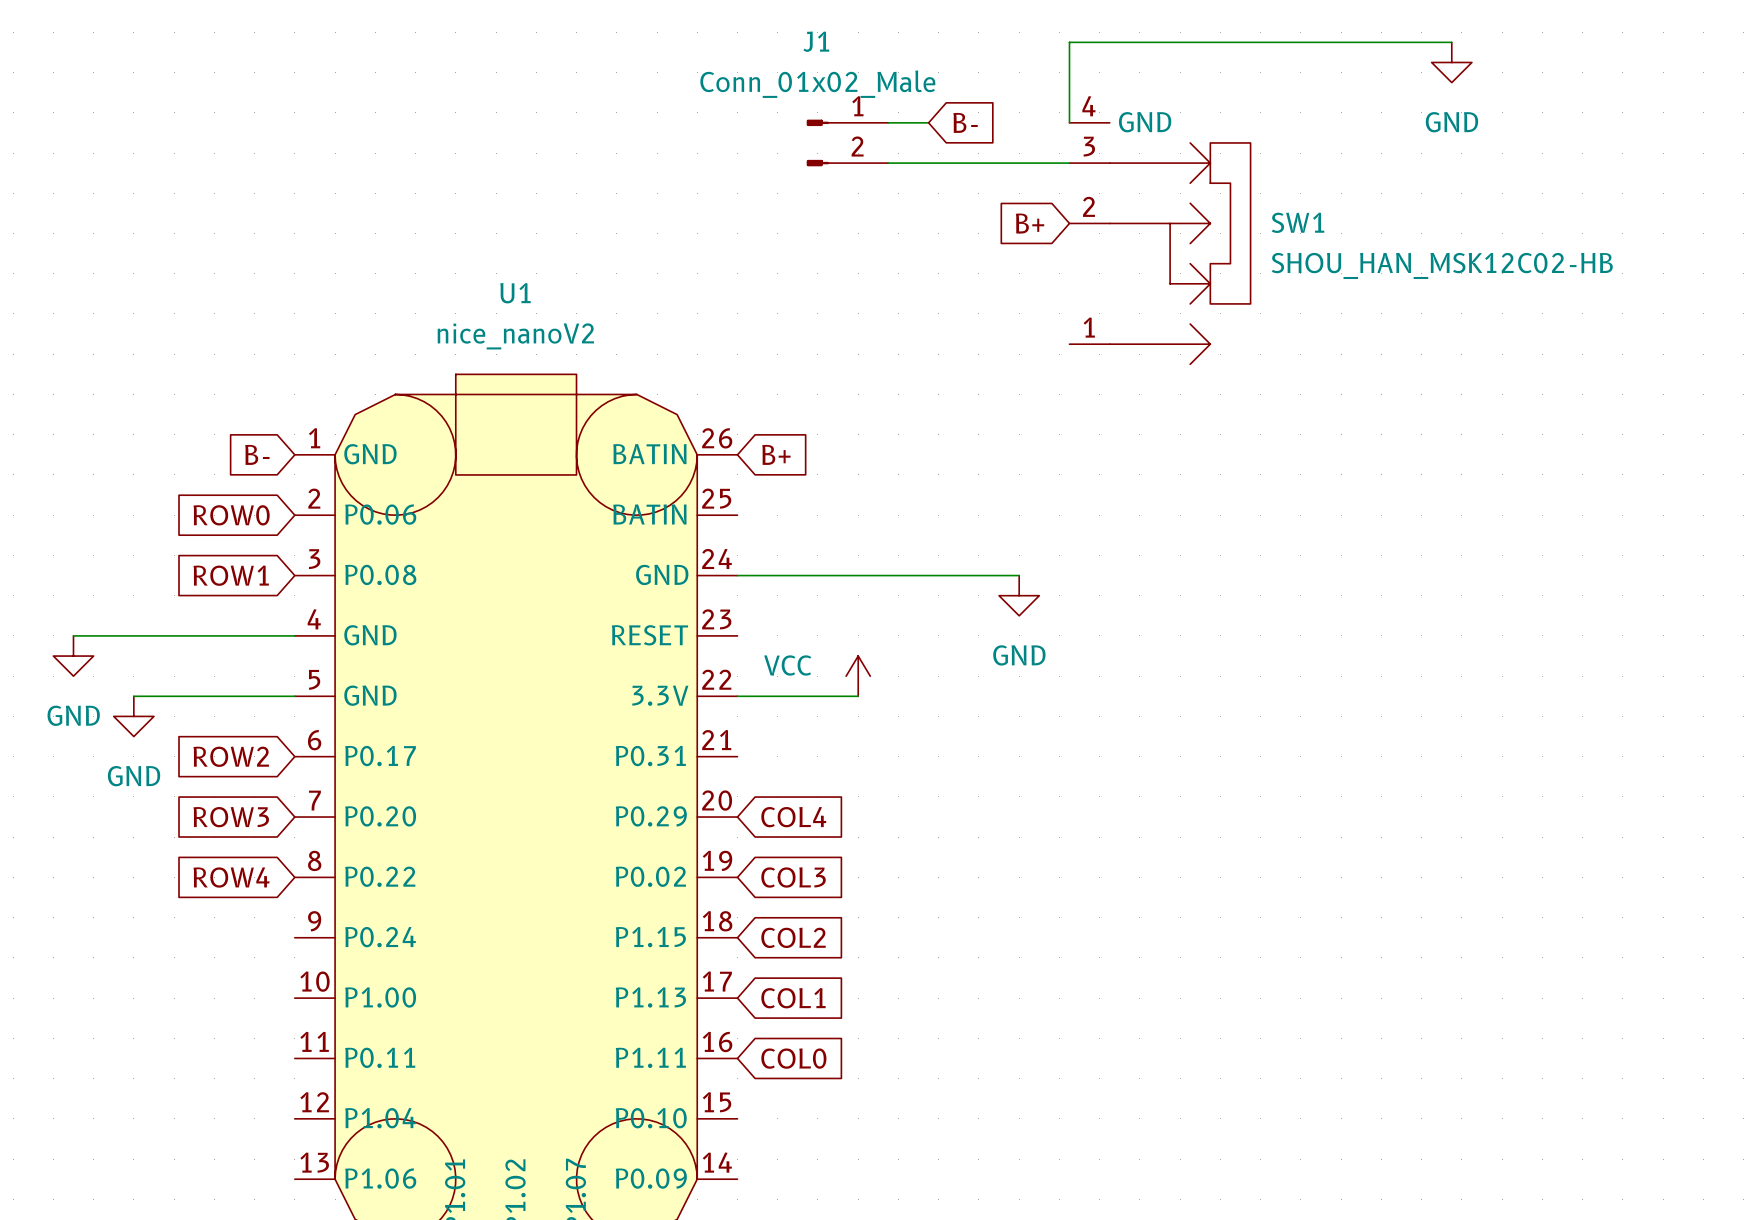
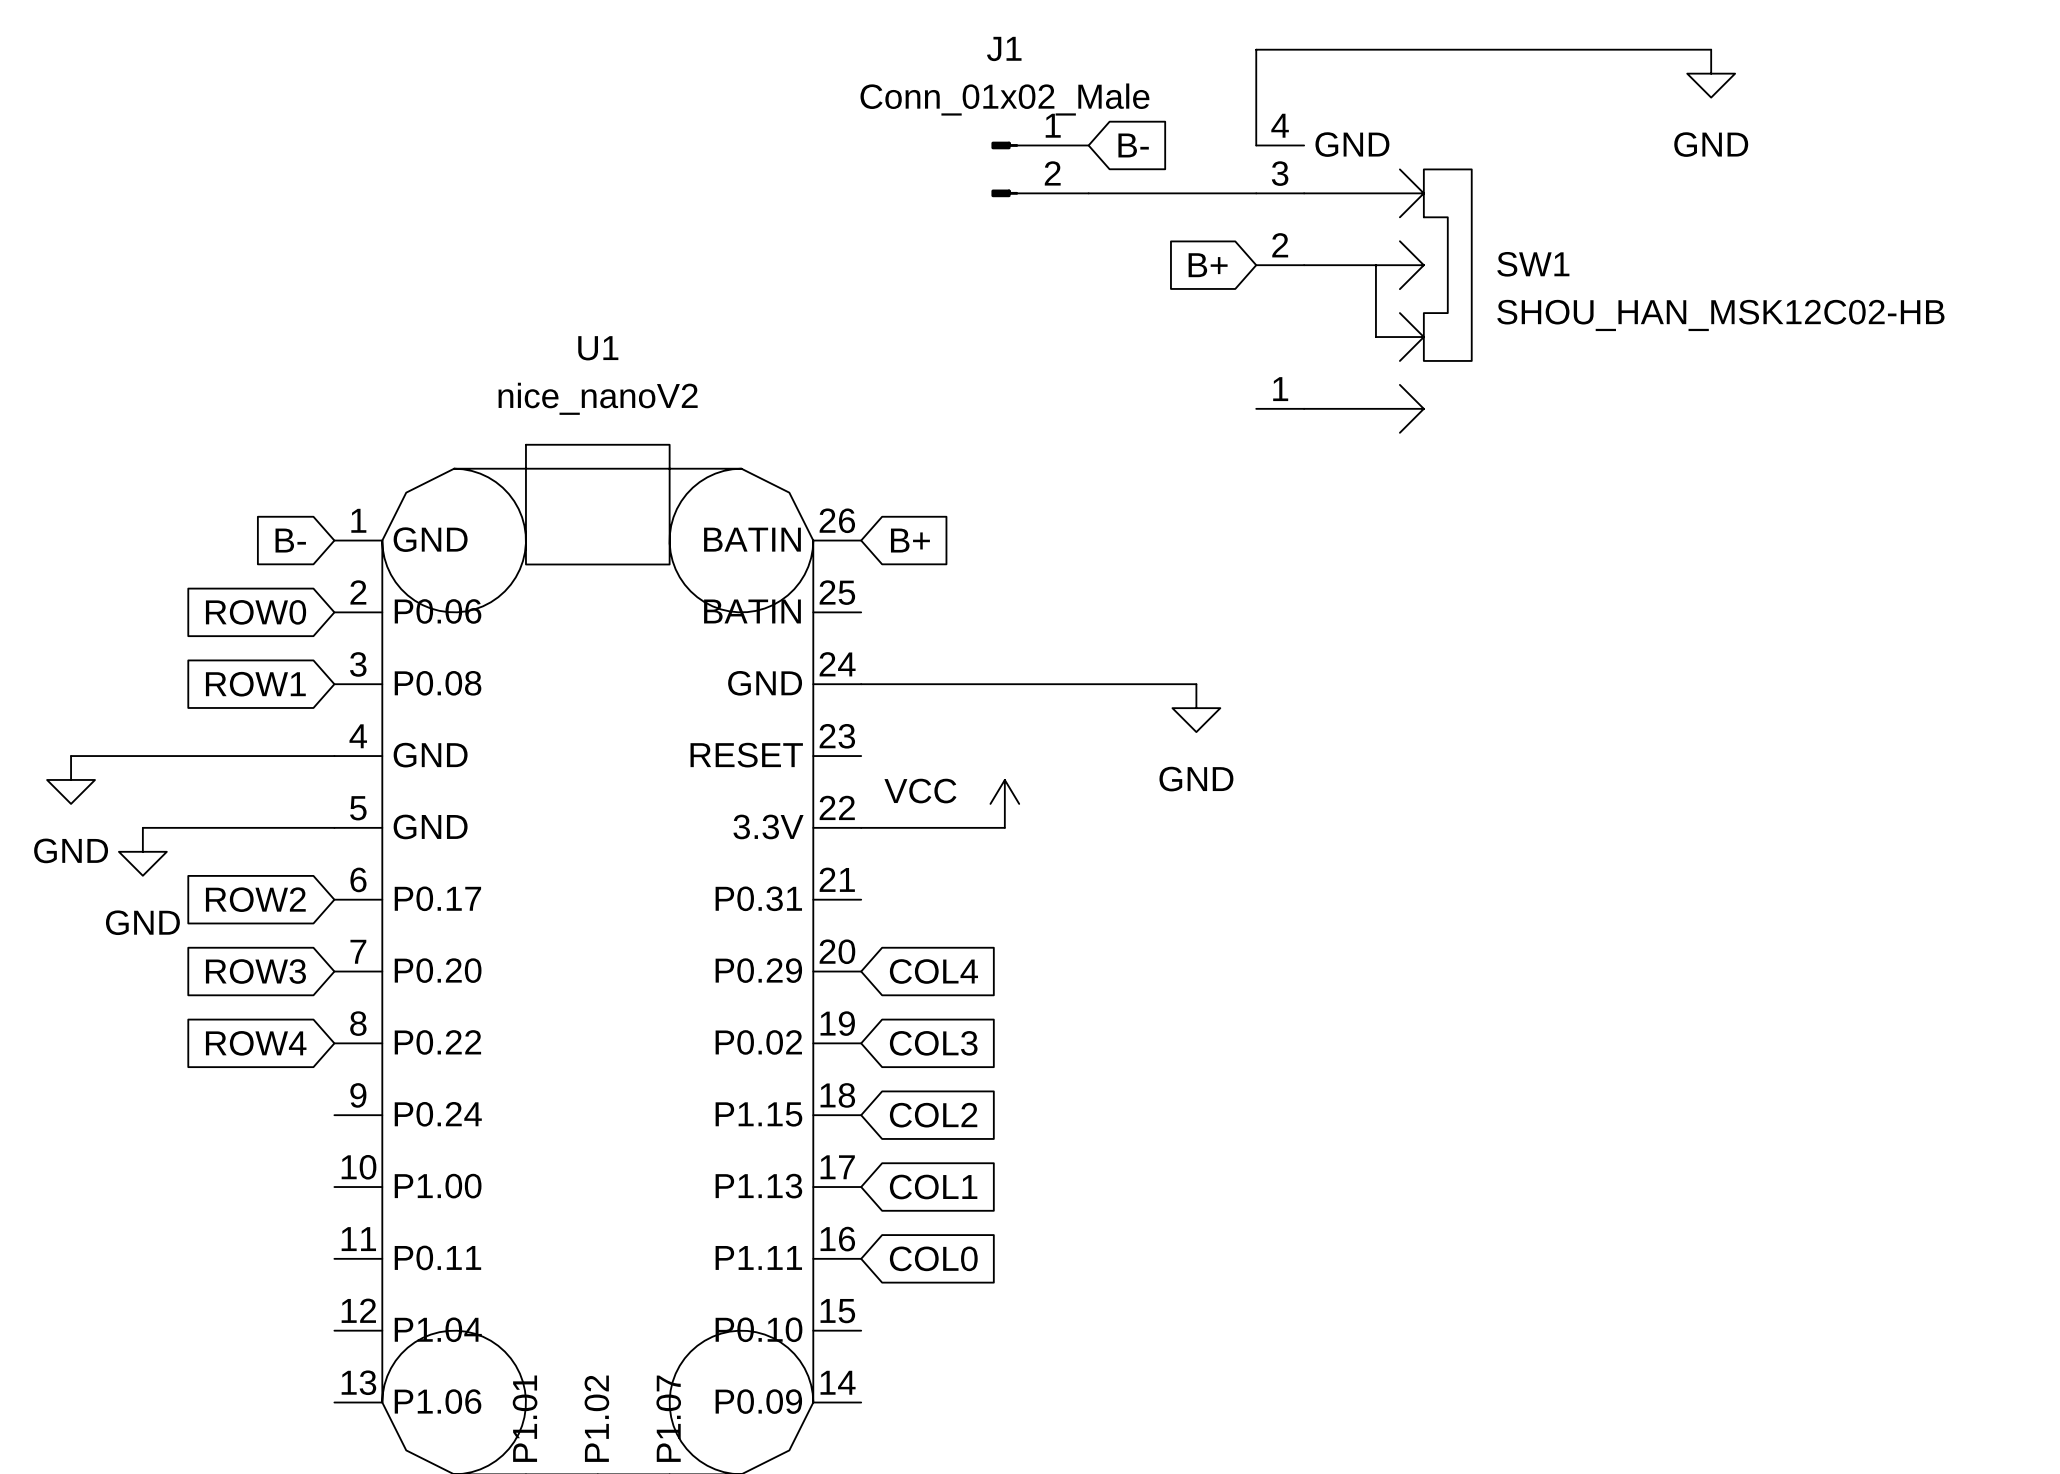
J1 position: (847, 142) -> (1040, 169)

